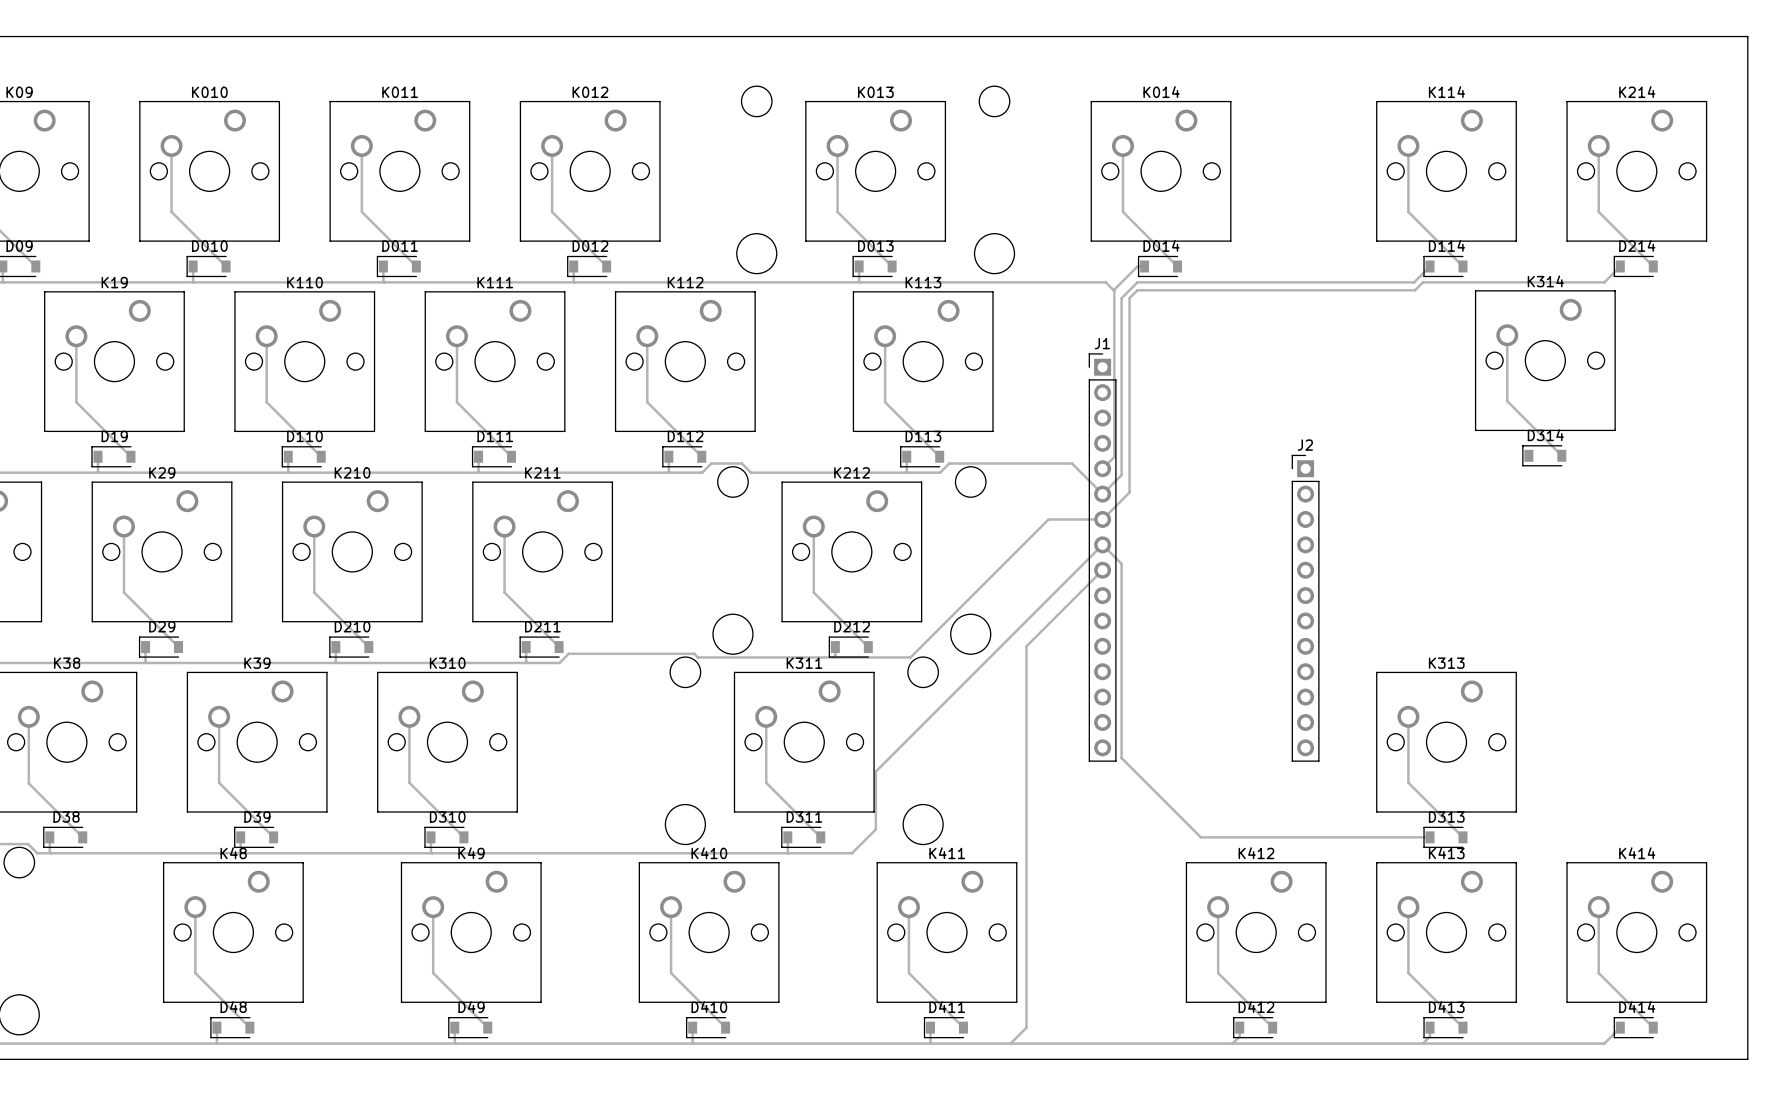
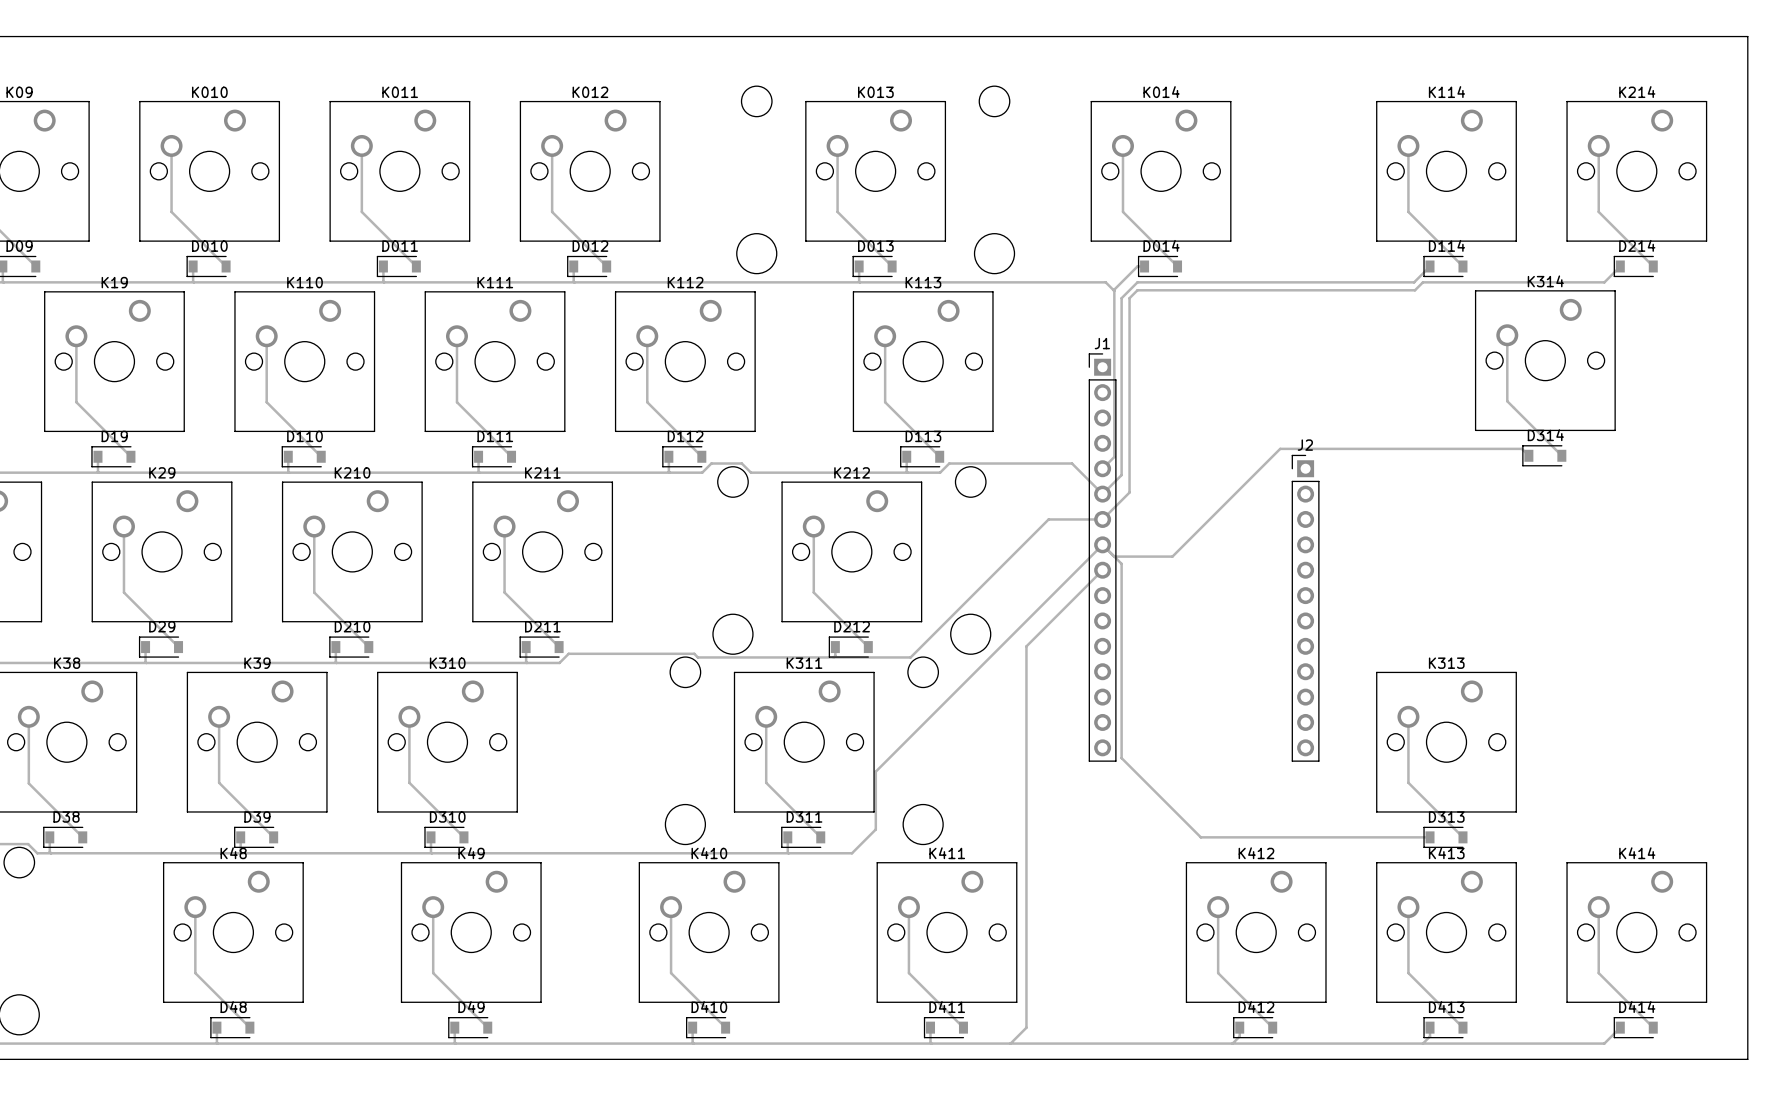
track: none -> (1528, 455) (1521, 448) (1280, 448) (1172, 556) (1114, 556)

